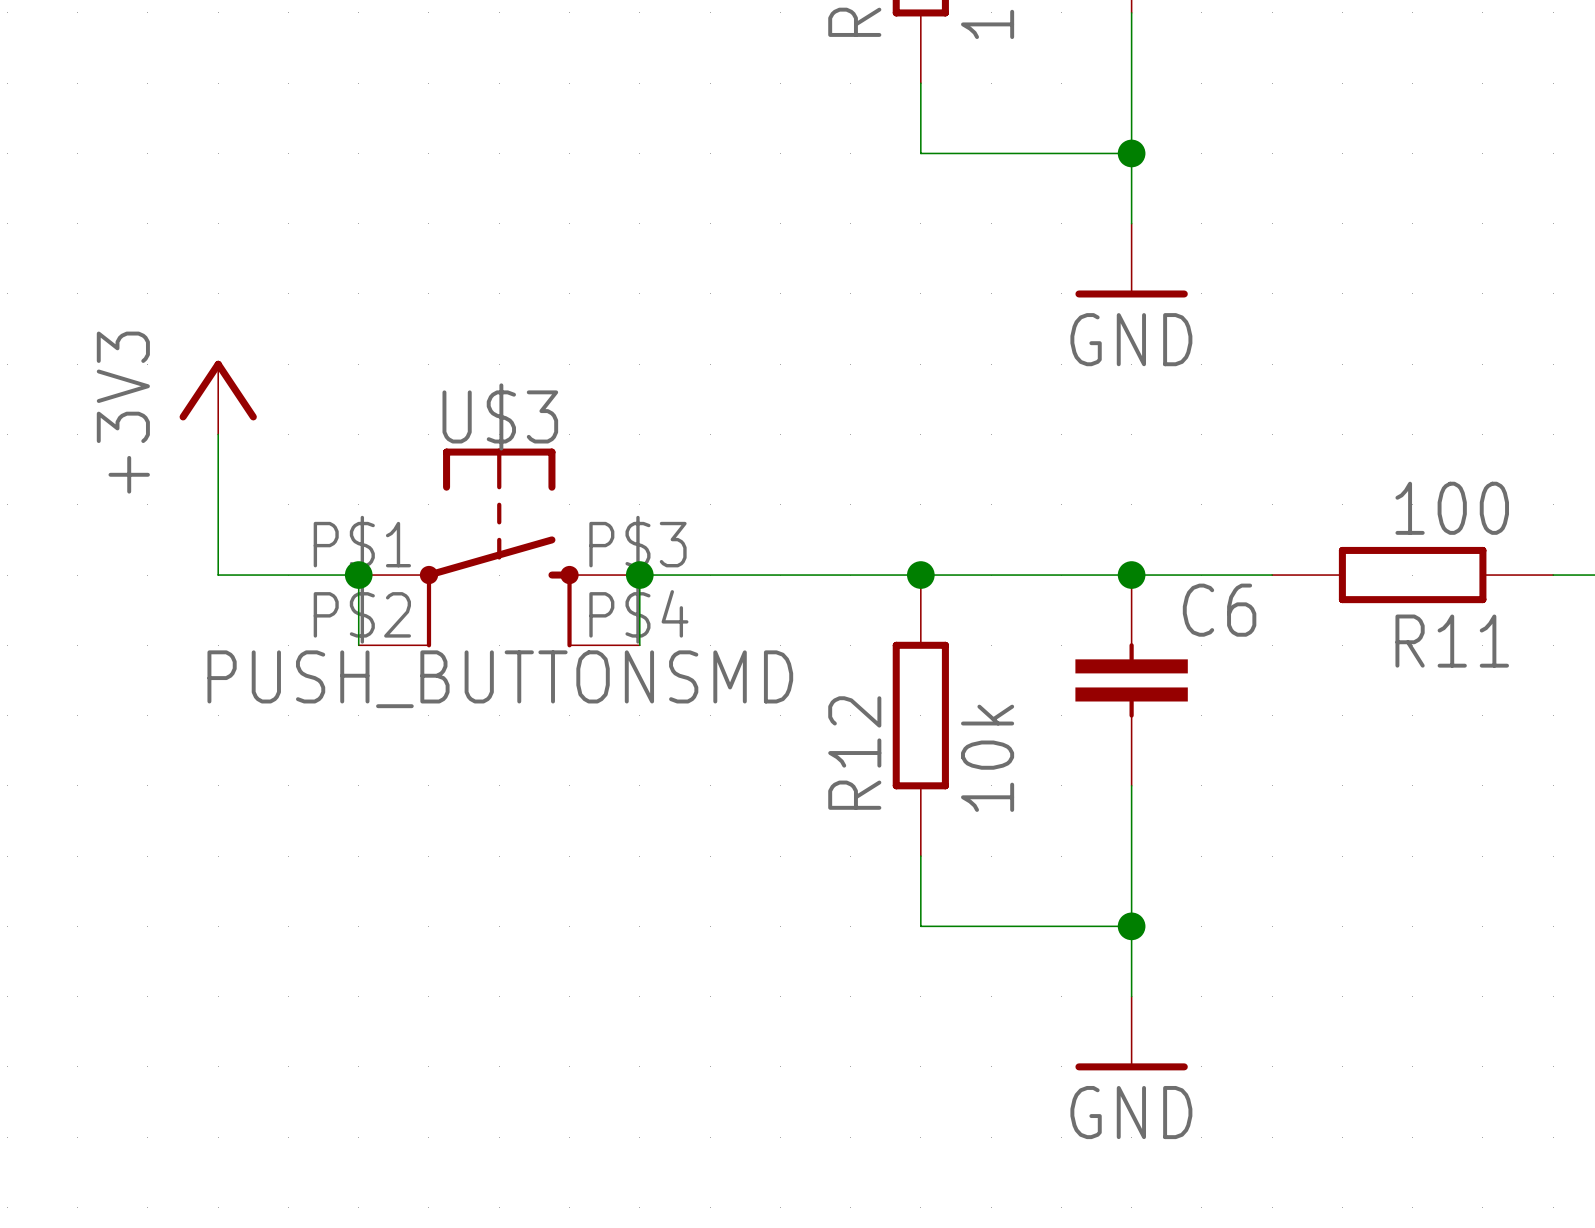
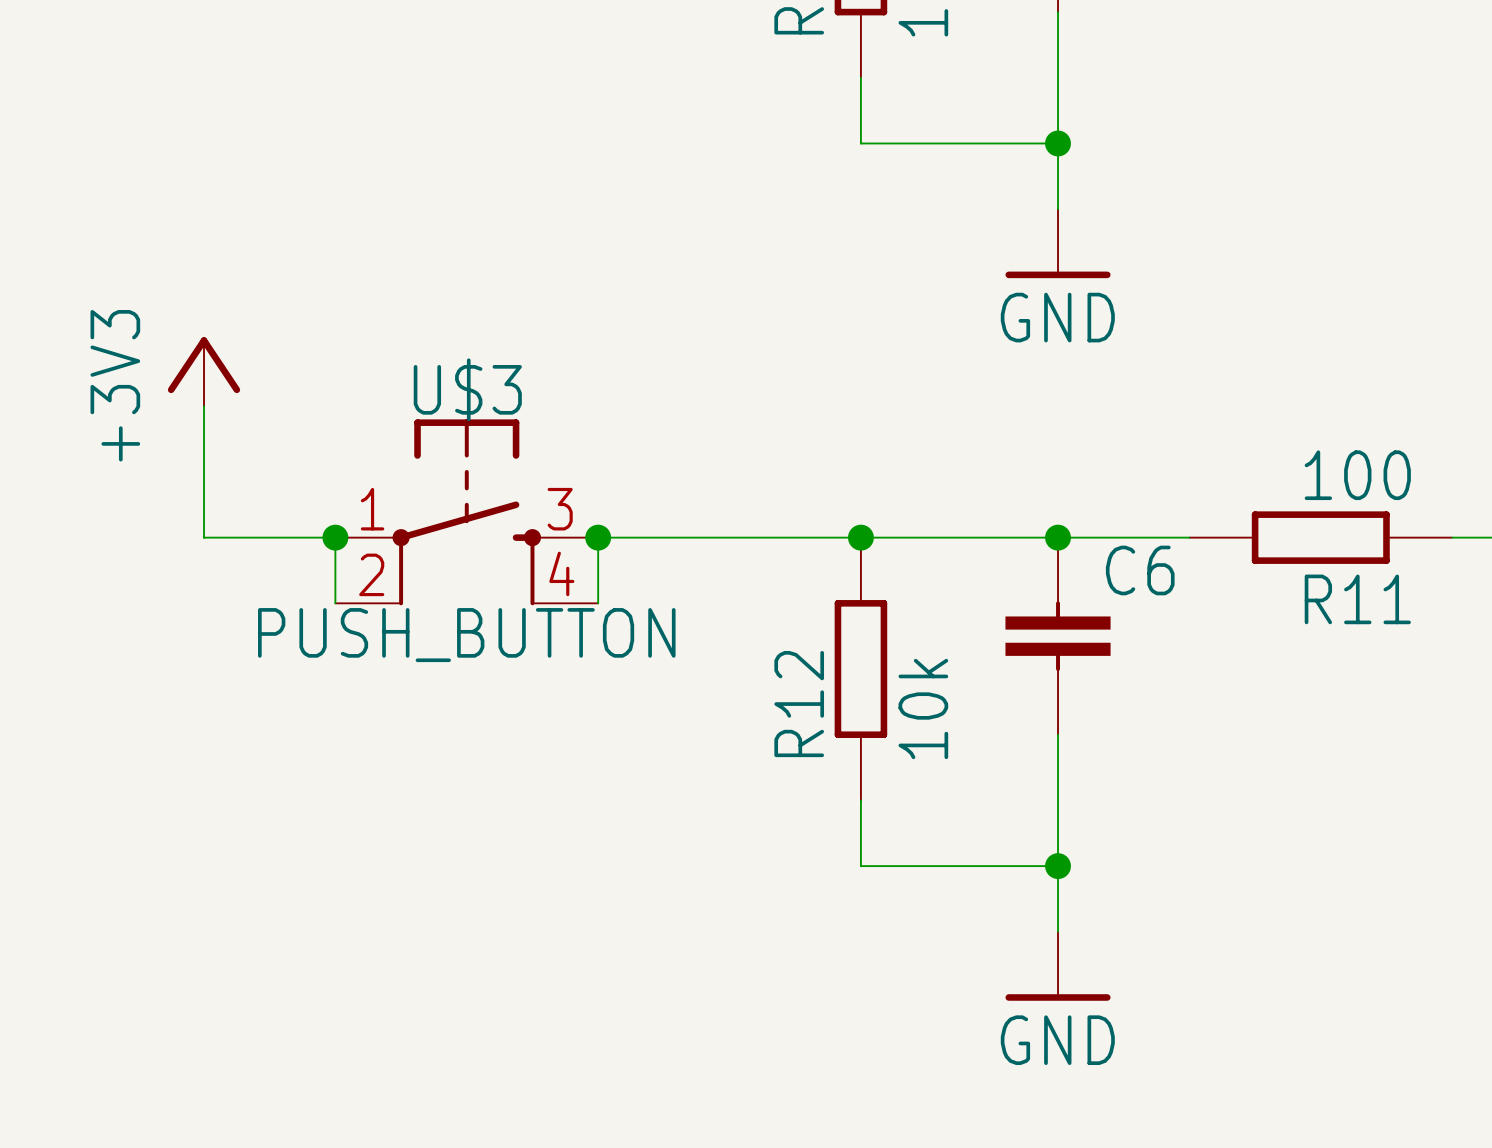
U$3 pin number: P$1 (362, 544) -> 1 (372, 509)
U$3 pin number: P$3 (637, 544) -> 3 (560, 509)
U$3 pin number: P$2 (362, 614) -> 2 (371, 574)
U$3 pin number: P$4 (638, 614) -> 4 (561, 573)
U$3 value: PUSH_BUTTONSMD (500, 679) -> PUSH_BUTTON (466, 635)

